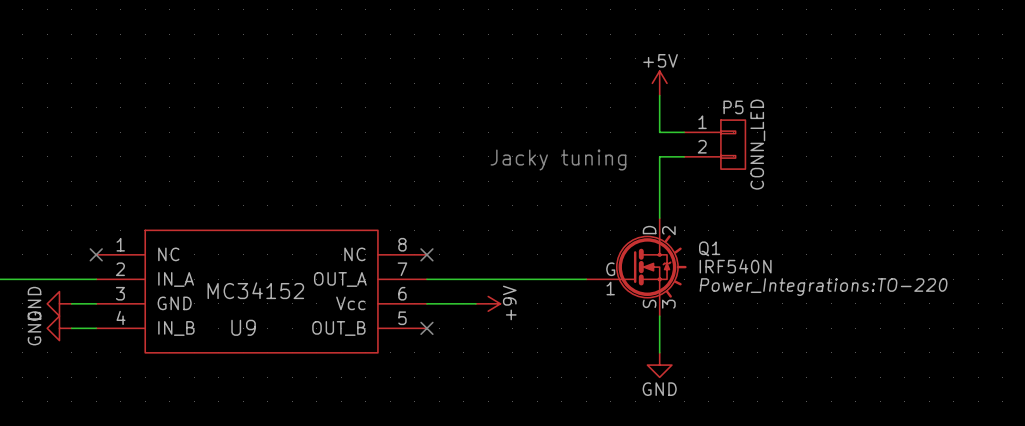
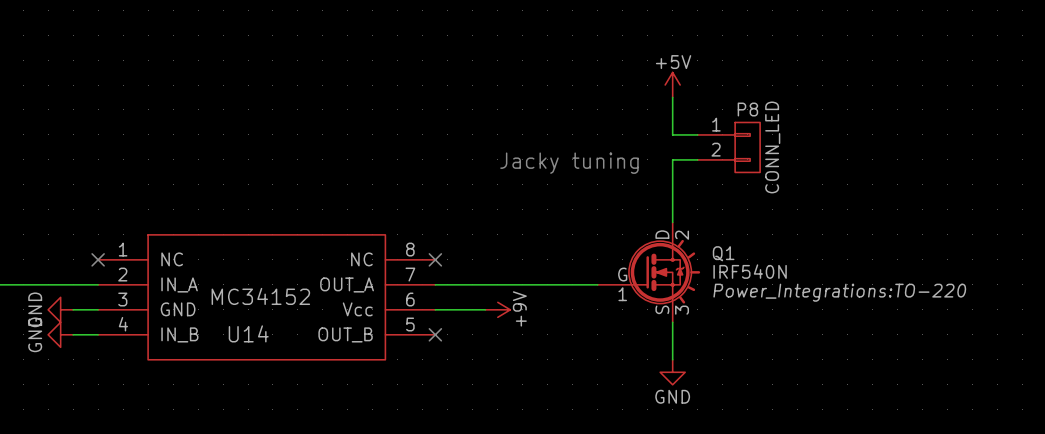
P5 name: P5 (733, 107) -> P8 (747, 109)
U9 name: U9 (243, 327) -> U14 (248, 333)

